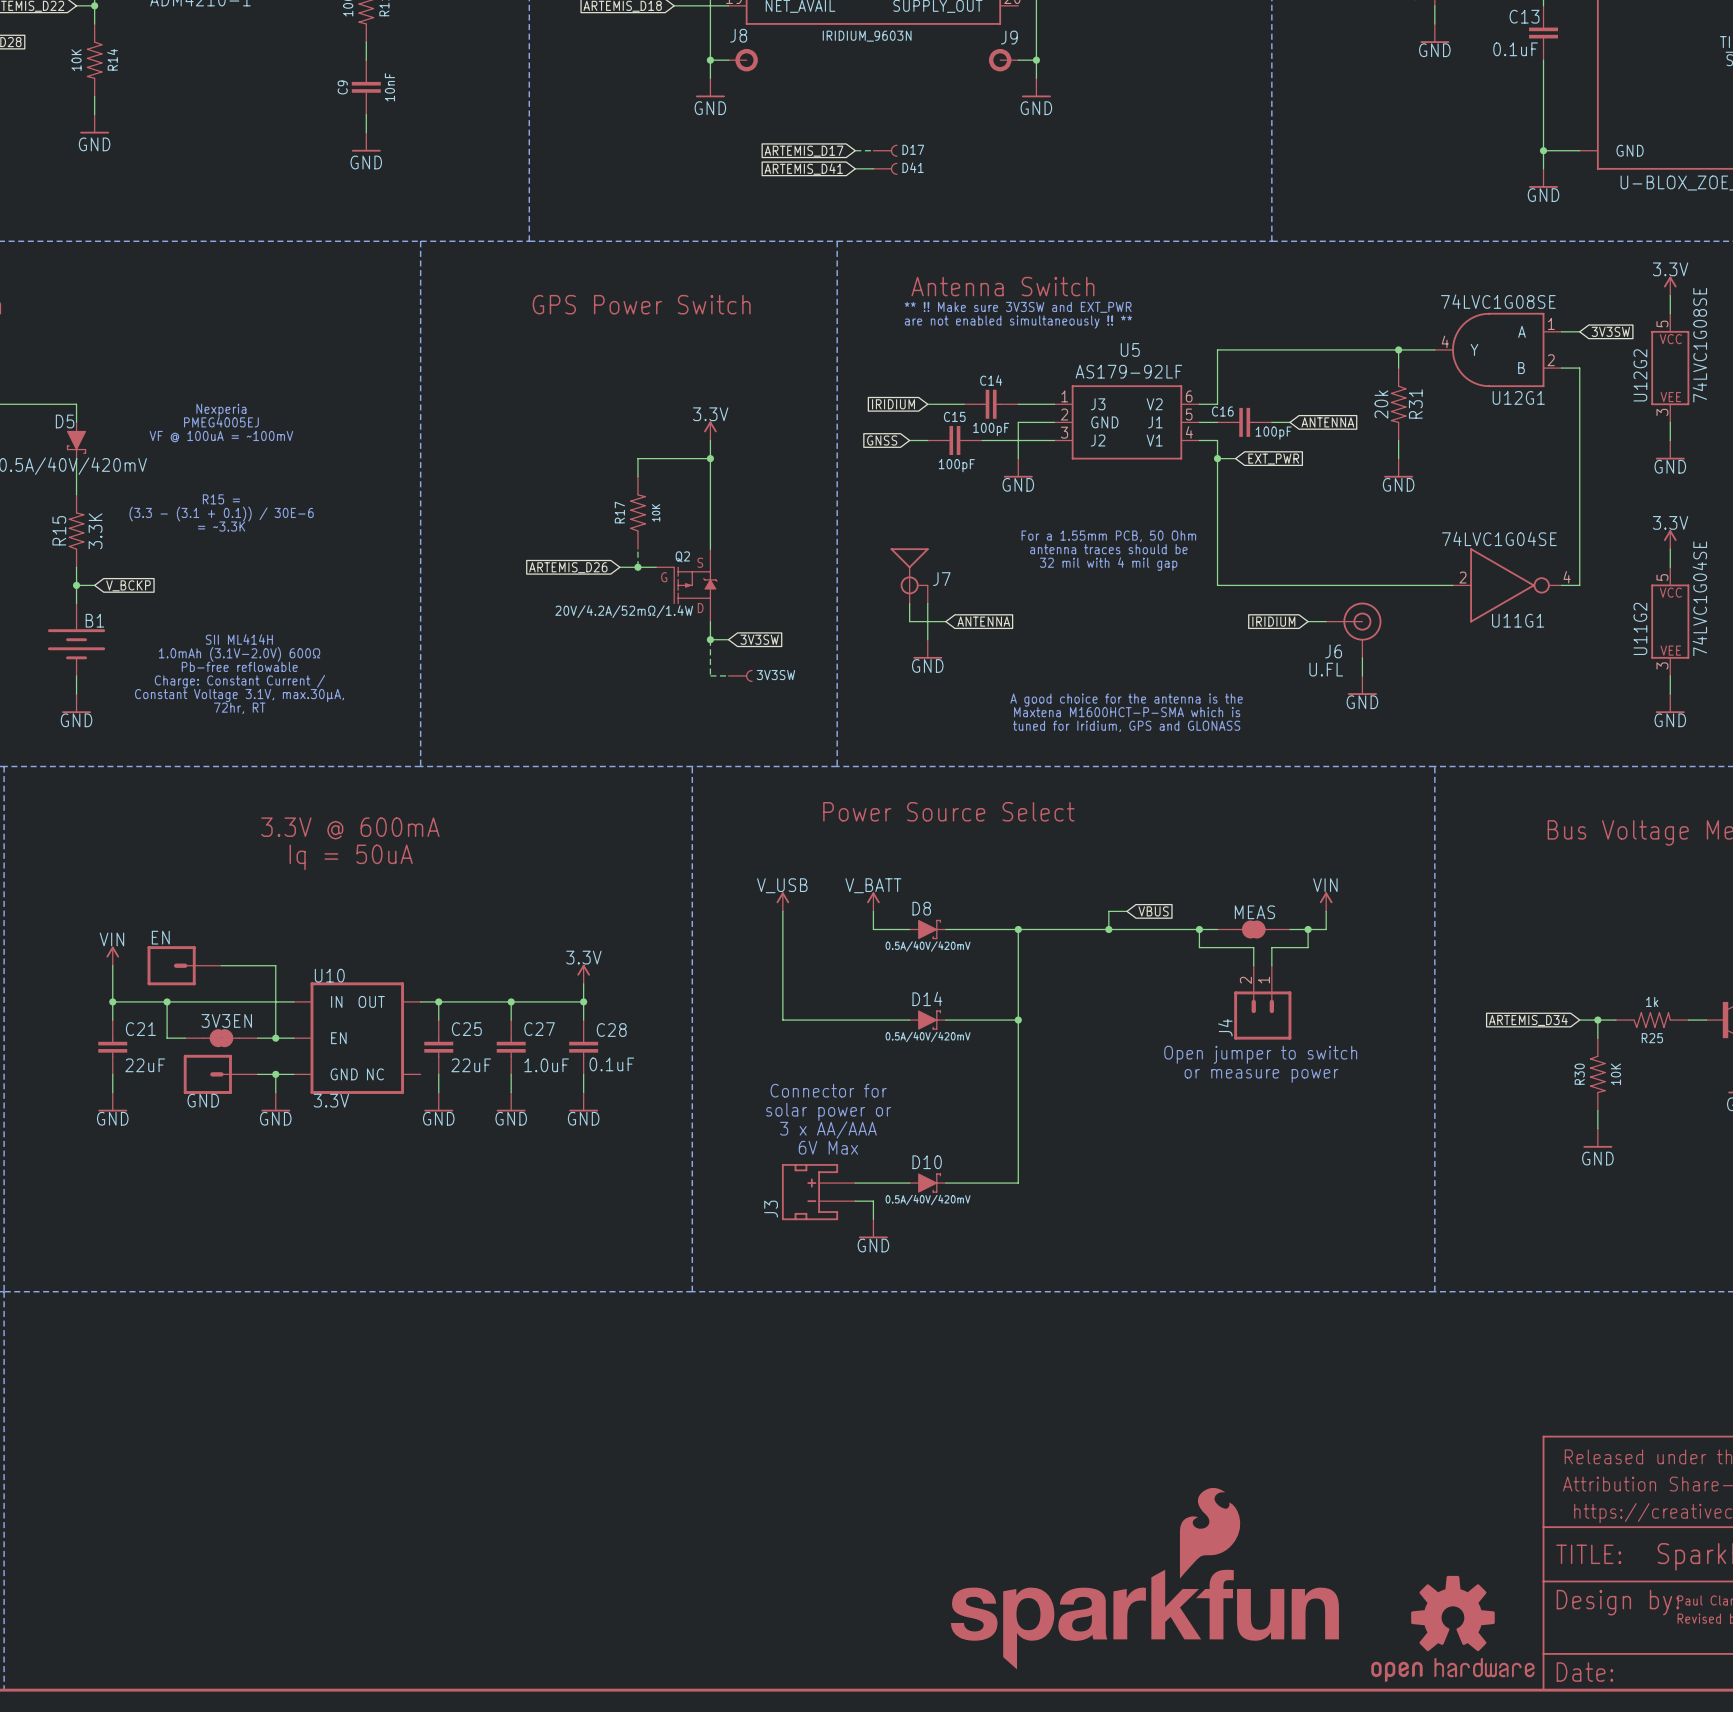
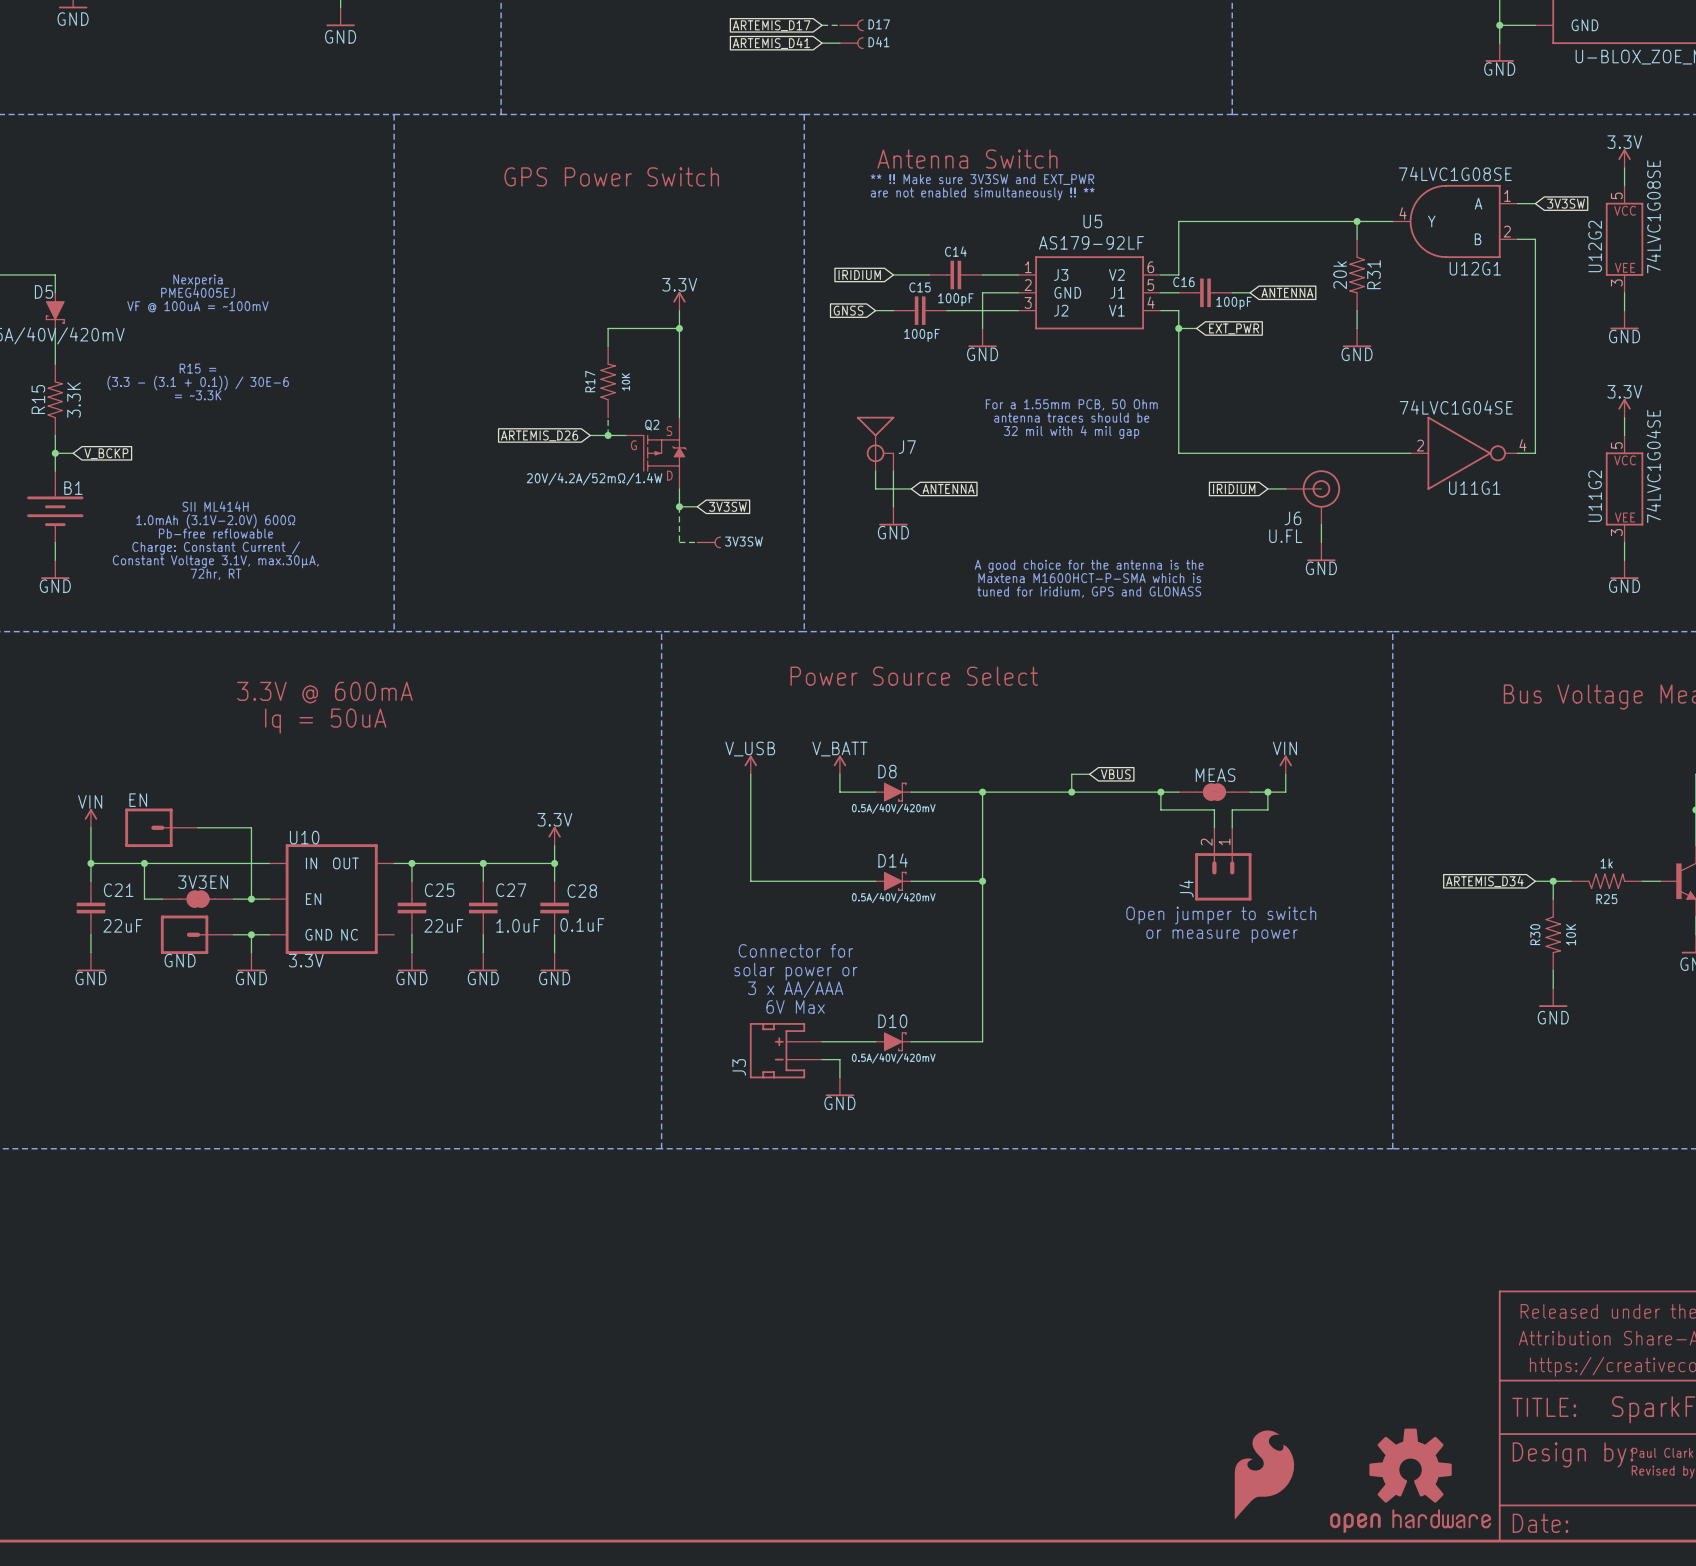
part: (1144, 1578) -> none
part: none -> (1264, 1475)

